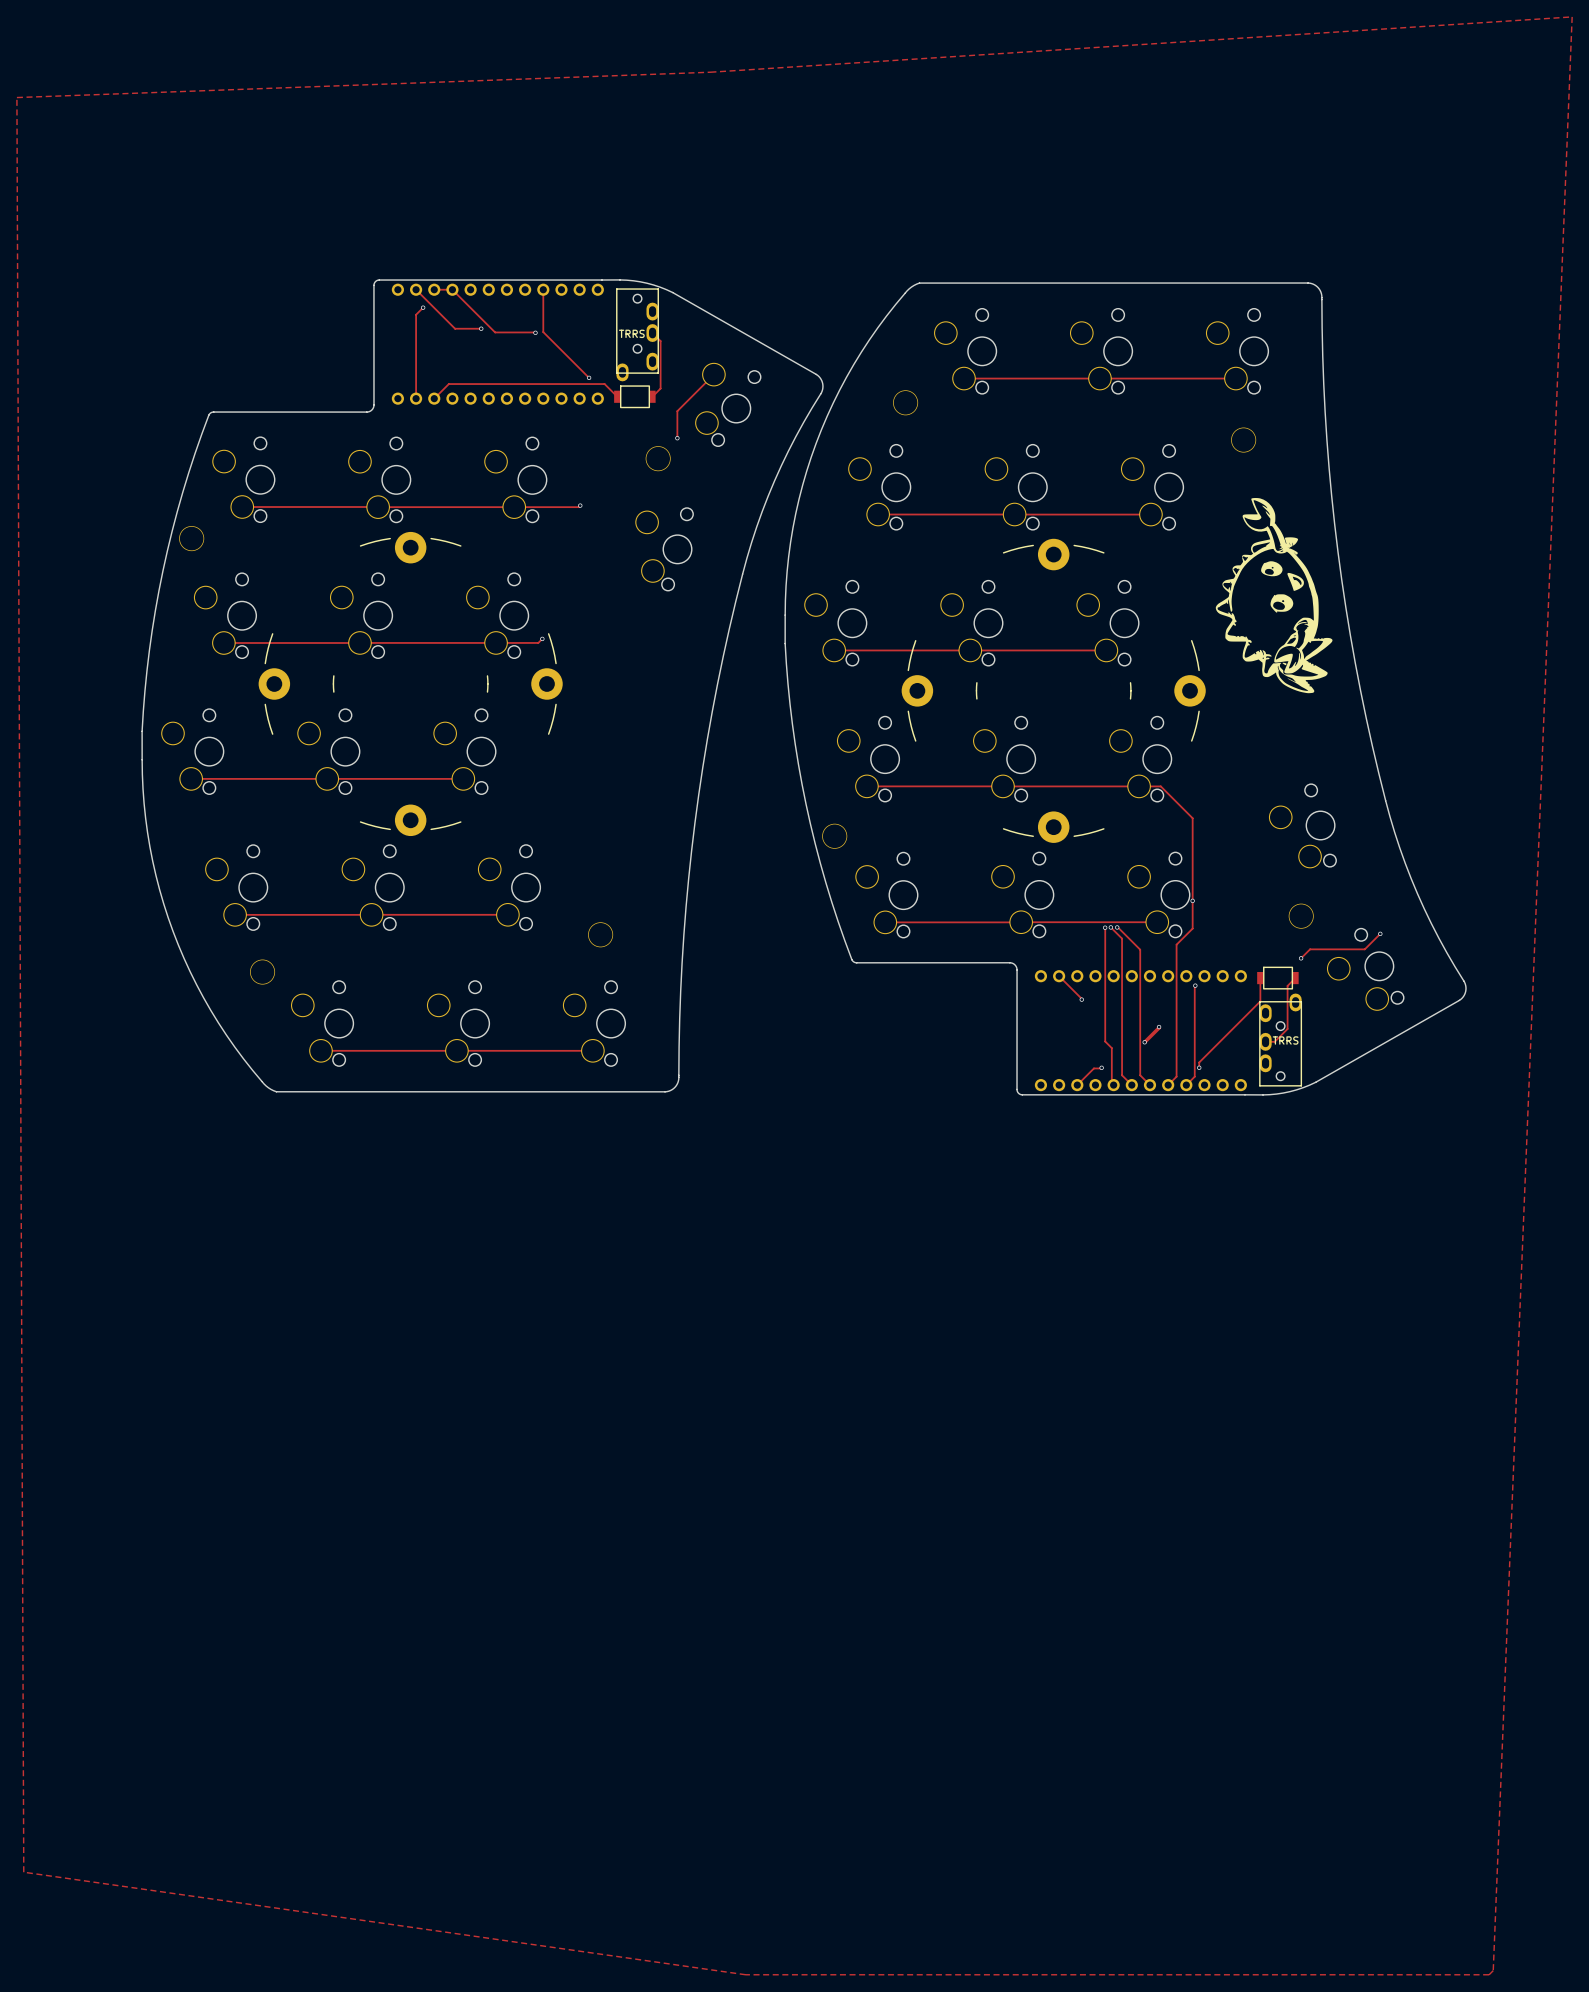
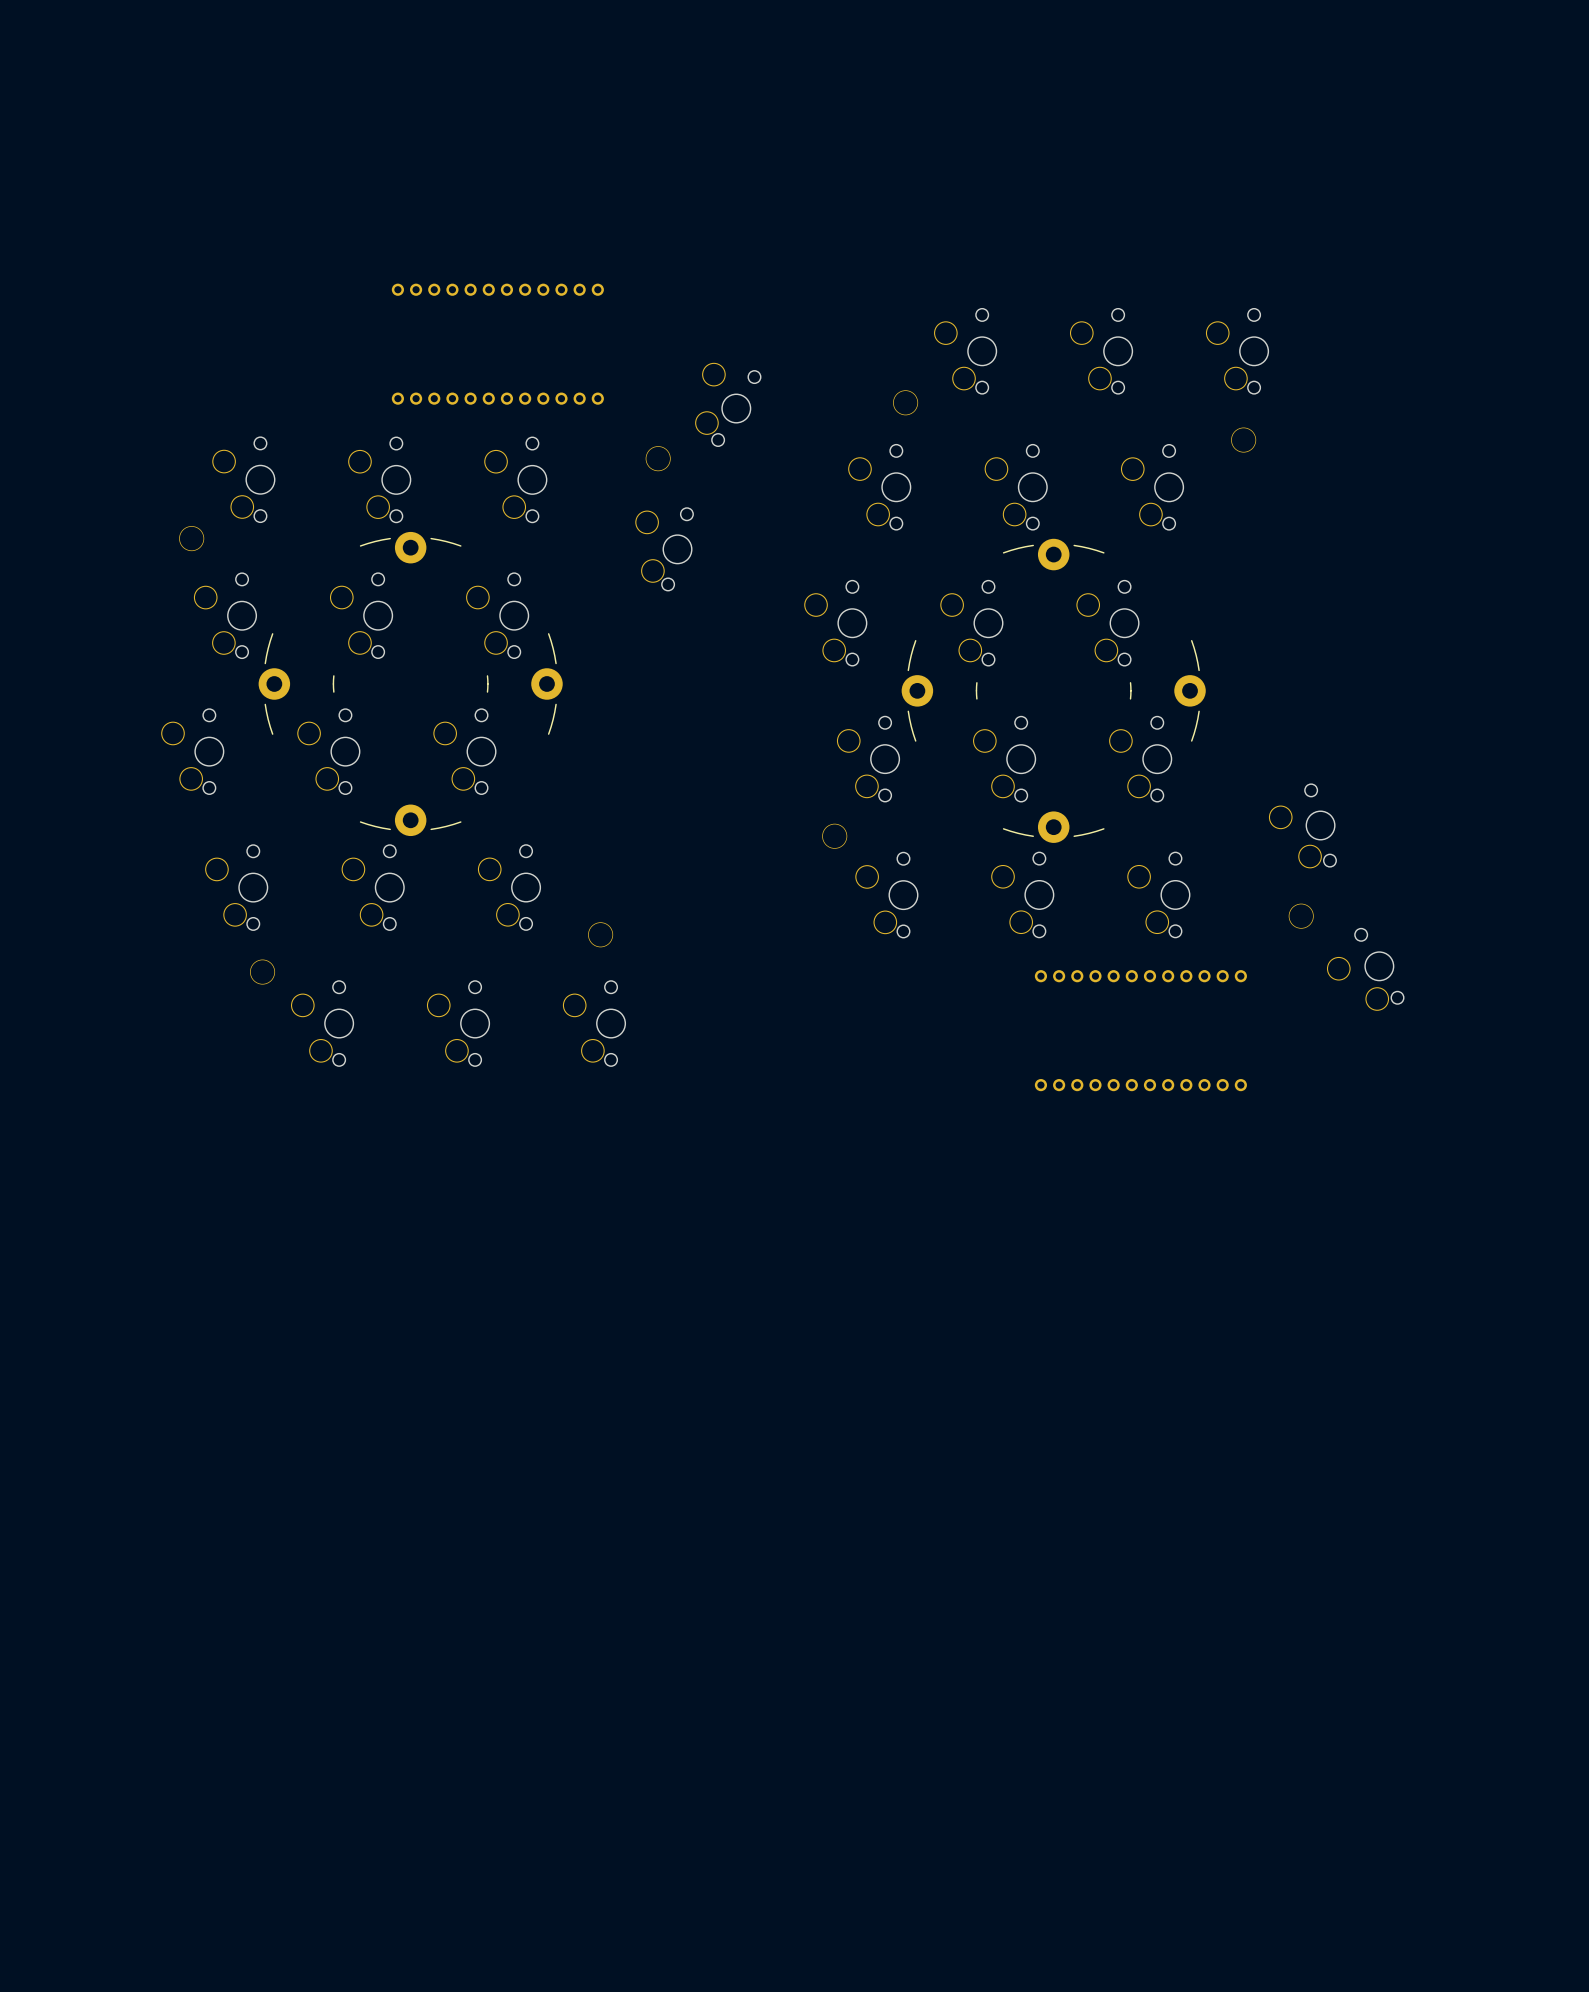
zone outline: (1572, 16) (710, 72) (16, 97) (23, 1872) (745, 1974) (1489, 1974) (1493, 1970) (1572, 16) -> none
board edge: (619, 279) (377, 280) (373, 285) (373, 404) (371, 410) (366, 412) (213, 412) (208, 415) (177, 511) (155, 610) (146, 670) (142, 731) (144, 803) (155, 875) (168, 917) (184, 958) (203, 997) (226, 1035) (263, 1083) (273, 1090) (665, 1091) (672, 1089) (677, 1082) (682, 962) (691, 850) (702, 767) (723, 656) (742, 574) (762, 511) (781, 466) (821, 392) (822, 384) (816, 374) (672, 292) (647, 283) (619, 279) -> none
board edge: (1308, 283) (919, 283) (906, 290) (861, 351) (833, 403) (811, 457) (799, 499) (790, 542) (786, 585) (785, 643) (792, 724) (802, 784) (815, 843) (838, 921) (851, 959) (855, 962) (1009, 962) (1014, 964) (1017, 969) (1017, 1089) (1020, 1094) (1263, 1094) (1290, 1091) (1315, 1082) (1459, 1000) (1465, 993) (1464, 982) (1431, 923) (1405, 863) (1389, 816) (1372, 745) (1350, 635) (1334, 524) (1325, 412) (1321, 295) (1317, 287) (1308, 283) -> none
track: (416, 289) (455, 328) (481, 328) -> none
track: (434, 289) (452, 289) (495, 332) (535, 332) -> none
track: (543, 289) (543, 332) (589, 377) -> none
track: (423, 307) (416, 314) (416, 398) -> none
via: (423, 307) -> none
via: (481, 328) -> none
via: (535, 332) -> none
track: (652, 333) (660, 341) (660, 388) (652, 396) -> none
part: (637, 334) -> none
track: (713, 374) (677, 411) (677, 438) -> none
via: (589, 377) -> none
track: (964, 378) (1235, 378) -> none
track: (617, 396) (604, 384) (448, 384) (434, 398) -> none
part: (634, 396) -> none
via: (677, 438) -> none
track: (580, 505) (578, 507) (242, 507) -> none
via: (580, 505) -> none
track: (878, 514) (1014, 514) -> none
track: (1014, 514) (1150, 514) -> none
part: (1274, 595) -> none
track: (542, 638) (538, 642) (359, 642) -> none
via: (542, 638) -> none
track: (223, 643) (359, 643) -> none
track: (834, 650) (1106, 650) -> none
track: (191, 778) (463, 778) -> none
track: (866, 786) (1002, 786) -> none
track: (1003, 786) (1160, 786) (1192, 818) (1192, 928) (1176, 944) (1176, 1076) (1168, 1085) -> none
via: (1192, 900) -> none
track: (235, 914) (371, 914) -> none
track: (371, 914) (507, 914) -> none
track: (1157, 922) (885, 922) -> none
track: (1105, 927) (1105, 1041) (1111, 1048) (1111, 1083) (1113, 1085) -> none
via: (1105, 927) -> none
track: (1110, 927) (1122, 938) (1122, 1075) (1131, 1085) -> none
via: (1110, 927) -> none
track: (1117, 927) (1140, 949) (1140, 1075) (1149, 1085) -> none
via: (1117, 927) -> none
track: (1380, 933) (1364, 949) (1310, 949) (1301, 958) -> none
via: (1380, 933) -> none
via: (1301, 958) -> none
track: (1059, 976) (1081, 999) -> none
track: (1260, 978) (1260, 1001) (1199, 1062) (1199, 1067) -> none
part: (1277, 978) -> none
track: (1295, 978) (1287, 985) (1287, 1028) (1274, 1041) (1265, 1041) -> none
track: (1195, 985) (1194, 1076) (1186, 1085) -> none
via: (1195, 985) -> none
via: (1081, 999) -> none
track: (1159, 1027) (1144, 1042) -> none
via: (1159, 1027) -> none
part: (1280, 1039) -> none
via: (1144, 1042) -> none
track: (320, 1050) (592, 1050) -> none
track: (1101, 1067) (1093, 1068) (1077, 1085) -> none
via: (1101, 1067) -> none
via: (1199, 1067) -> none

